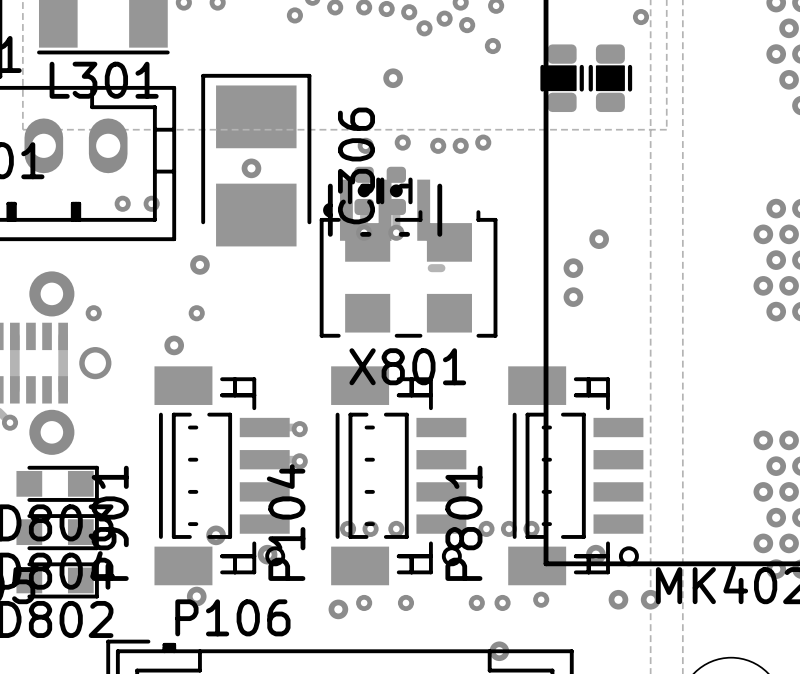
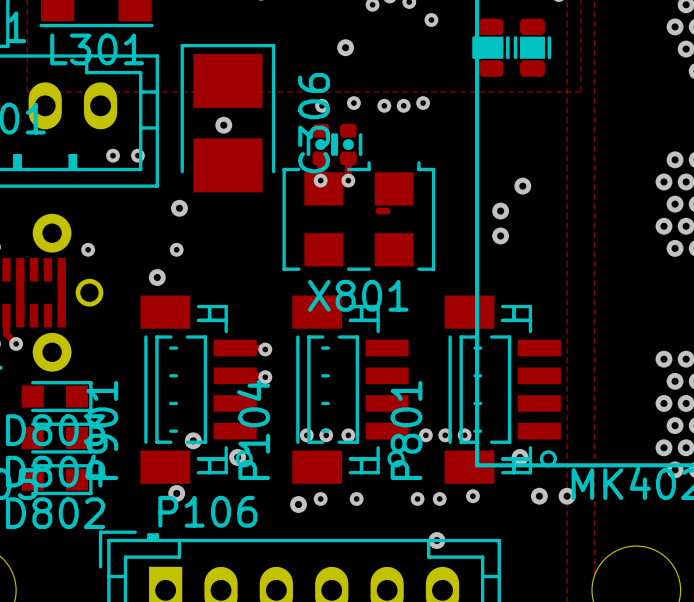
part: (382, 210) -> none

